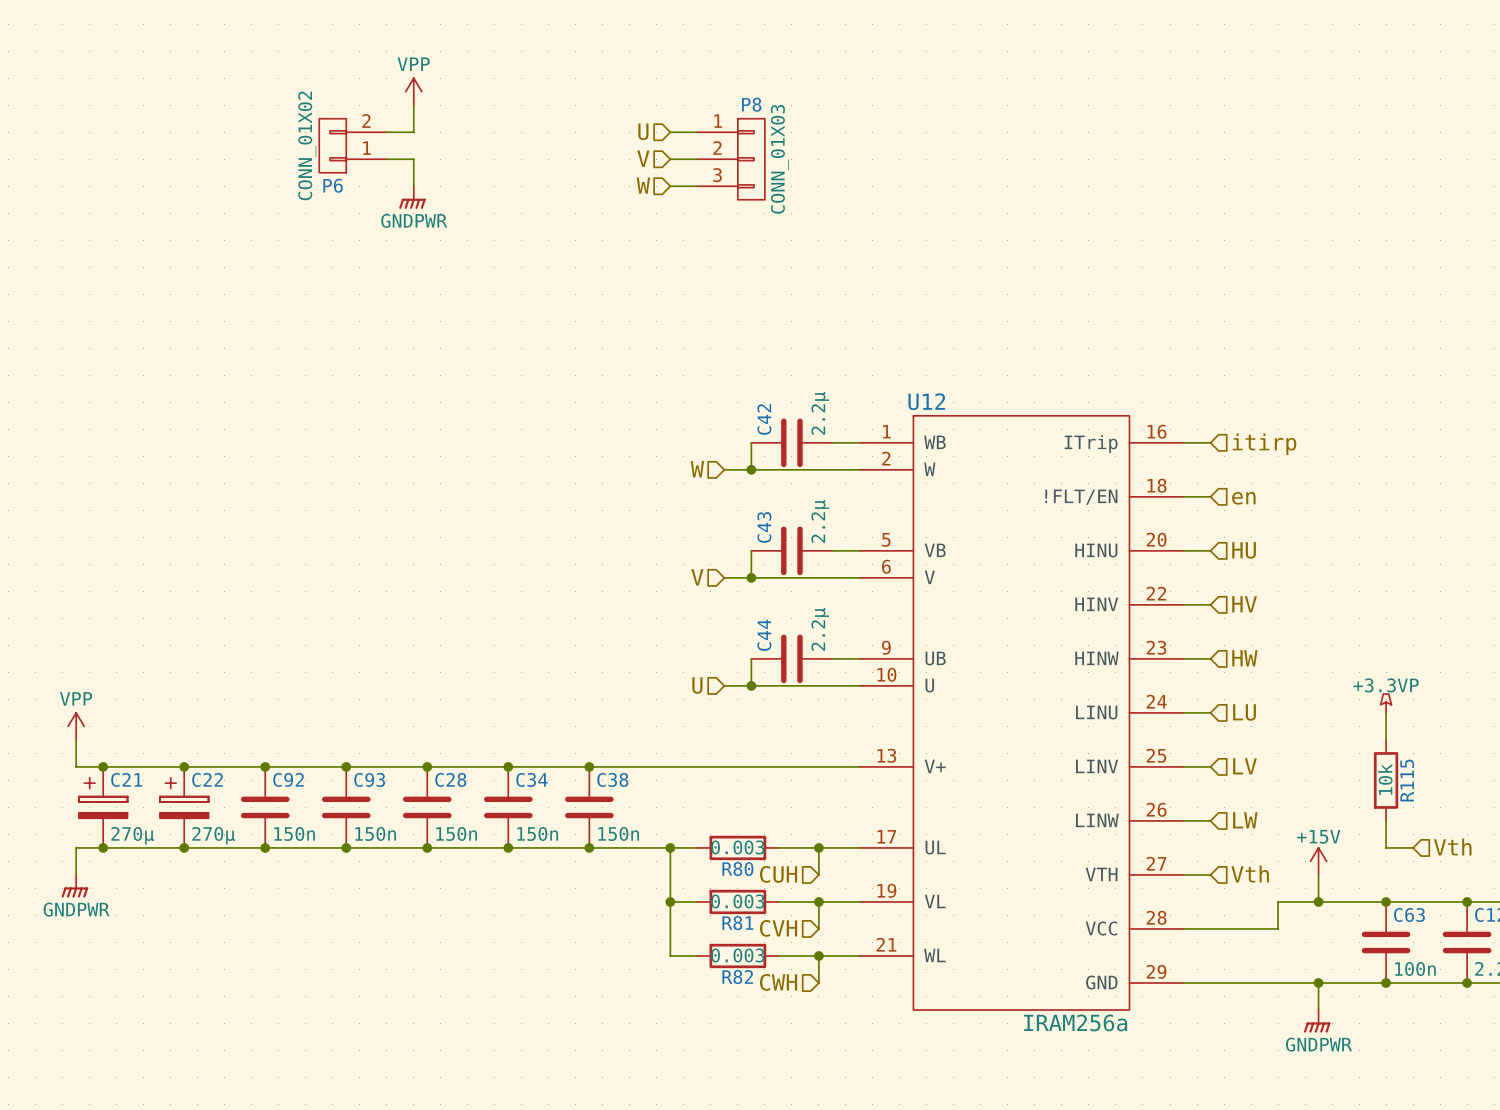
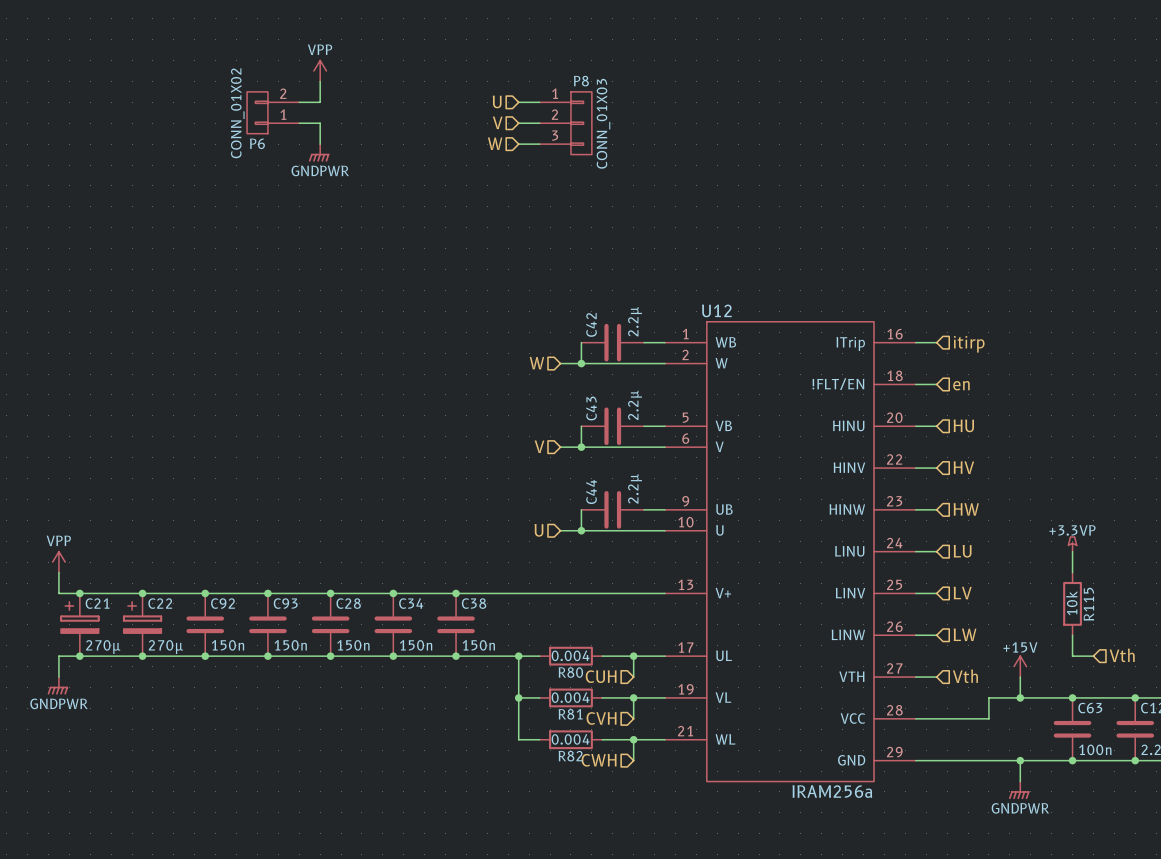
R80 value: 0.003 (737, 847) -> 0.004 (570, 655)
R81 value: 0.003 (737, 901) -> 0.004 (570, 697)
R82 value: 0.003 (737, 955) -> 0.004 (570, 739)

